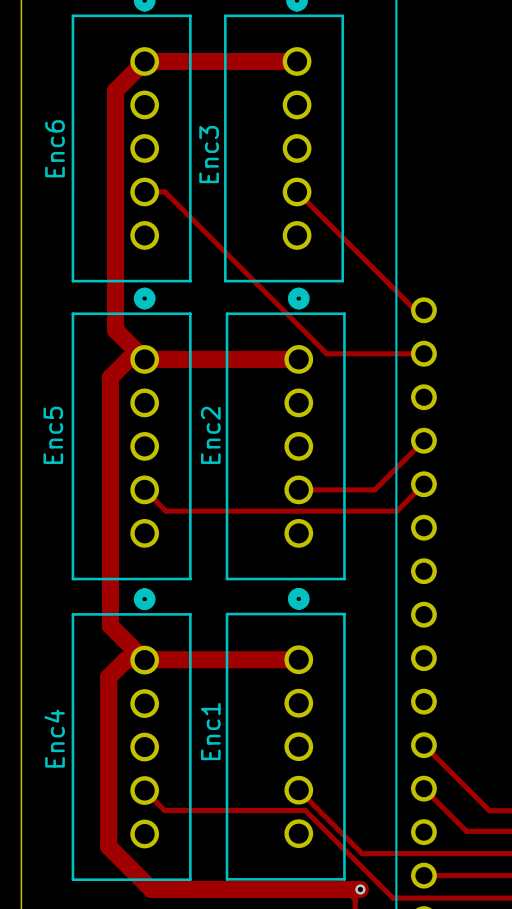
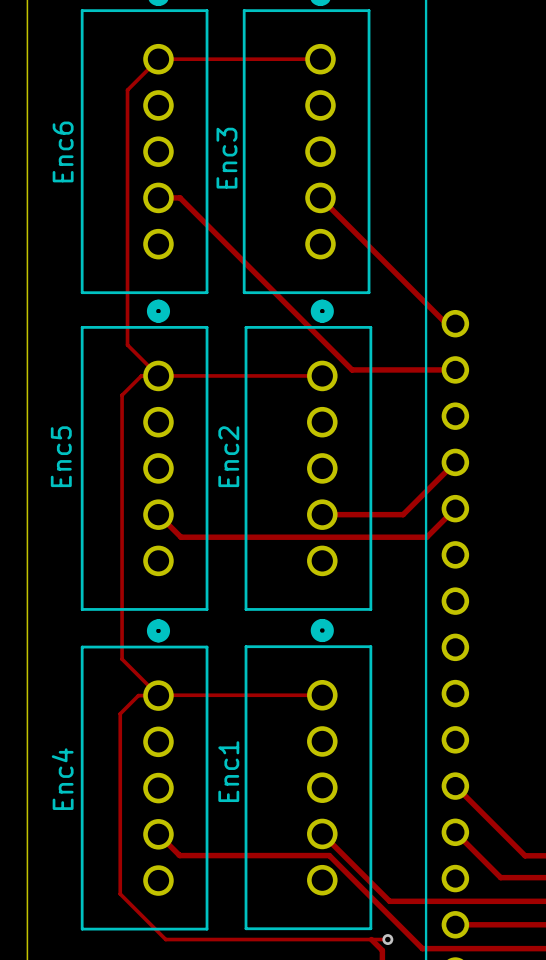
track width: thick (297, 61) (144, 61) (115, 90) (115, 330) (144, 359) -> thin (320, 59) (158, 59) (127, 90) (127, 344) (158, 375)
track width: thick (298, 359) (128, 359) (110, 377) (110, 625) (144, 660) -> thin (322, 375) (141, 375) (122, 395) (122, 659) (158, 695)
track width: thick (298, 659) (144, 660) -> thin (322, 695) (158, 695)
track width: thick (144, 660) (125, 660) (108, 677) (108, 846) (151, 889) (360, 889) -> thin (158, 695) (138, 695) (120, 713) (120, 894) (165, 939) (387, 939)

